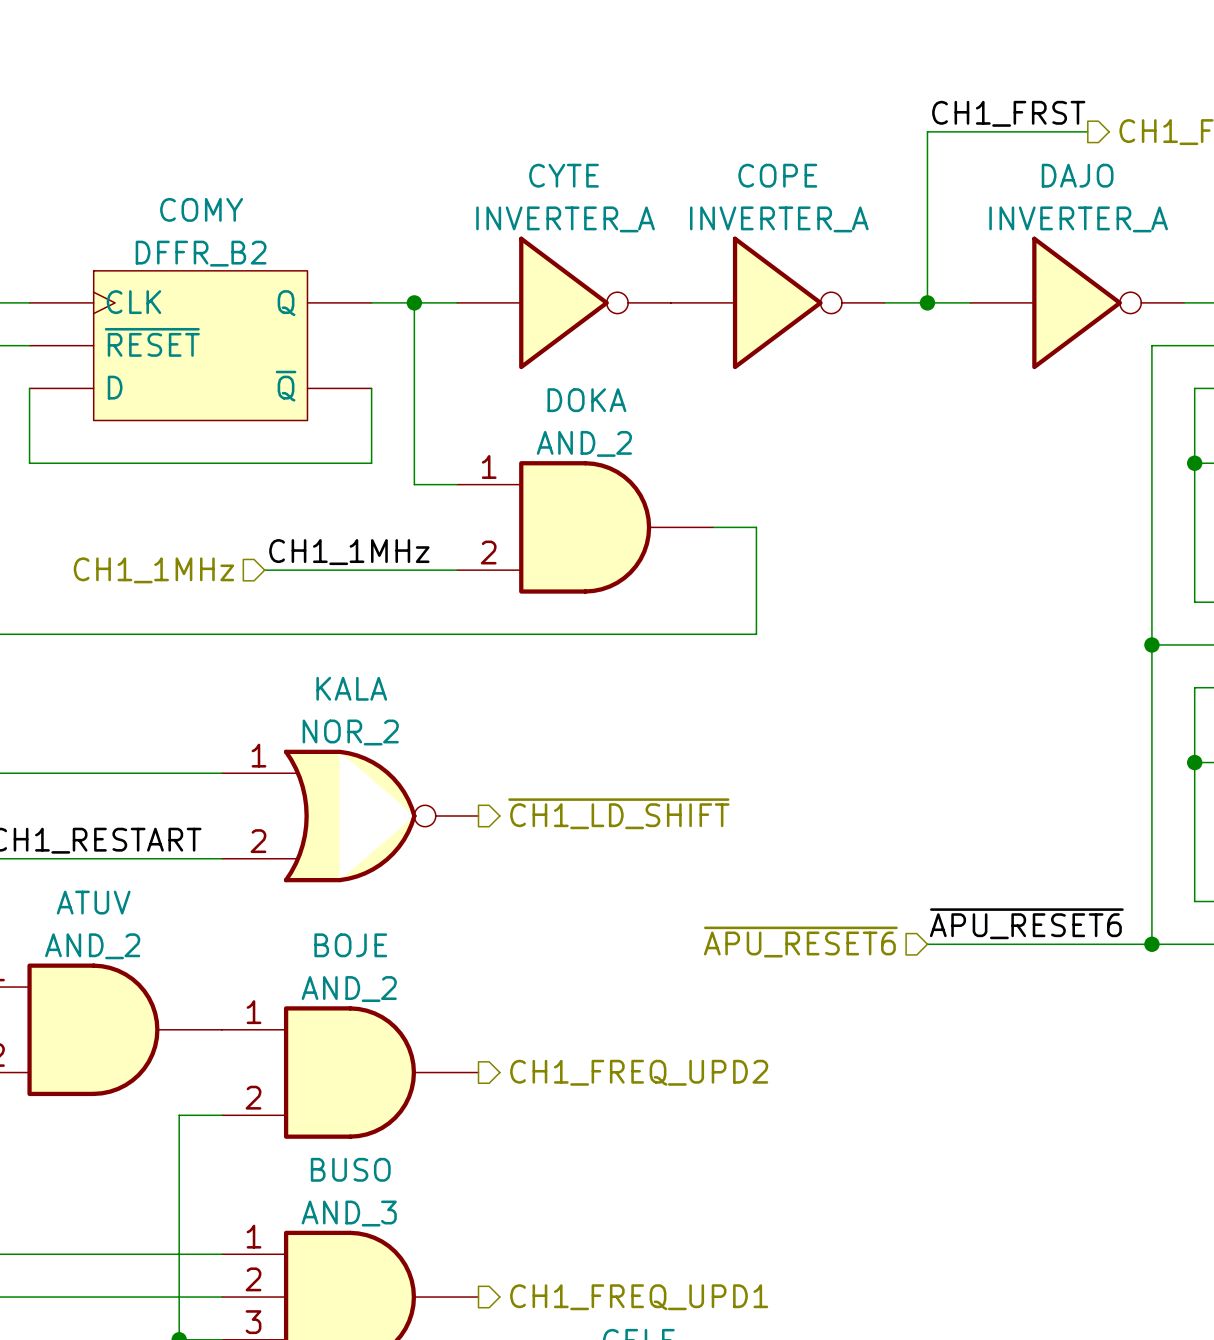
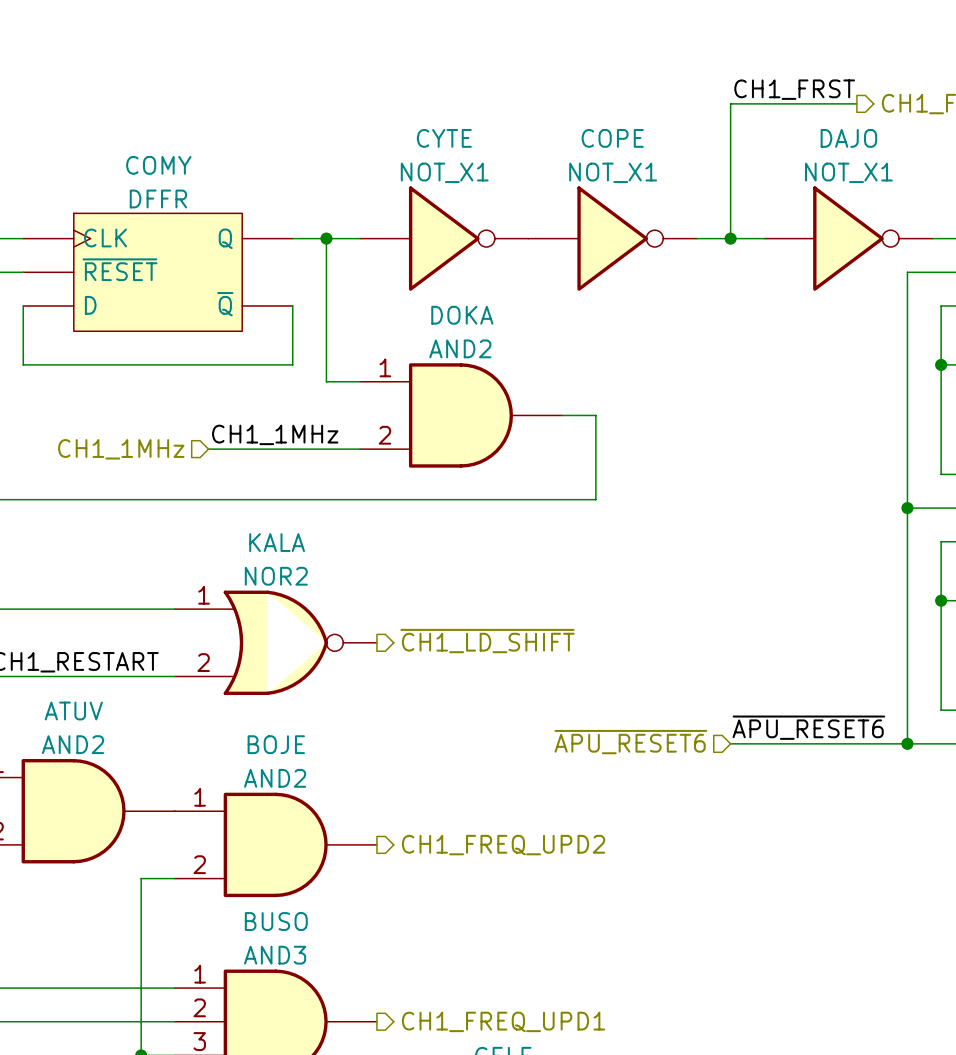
CYTE value: INVERTER_A (565, 219) -> NOT_X1 (444, 172)
COPE value: INVERTER_A (779, 219) -> NOT_X1 (613, 172)
DAJO value: INVERTER_A (1078, 219) -> NOT_X1 (848, 172)
COMY value: DFFR_B2 (201, 253) -> DFFR (158, 198)
DOKA value: AND_2 (584, 443) -> AND2 (460, 348)
KALA value: NOR_2 (350, 732) -> NOR2 (276, 576)
ATUV value: AND_2 (92, 946) -> AND2 (73, 744)
BOJE value: AND_2 (349, 989) -> AND2 (275, 778)
BUSO value: AND_3 (349, 1213) -> AND3 (275, 955)

